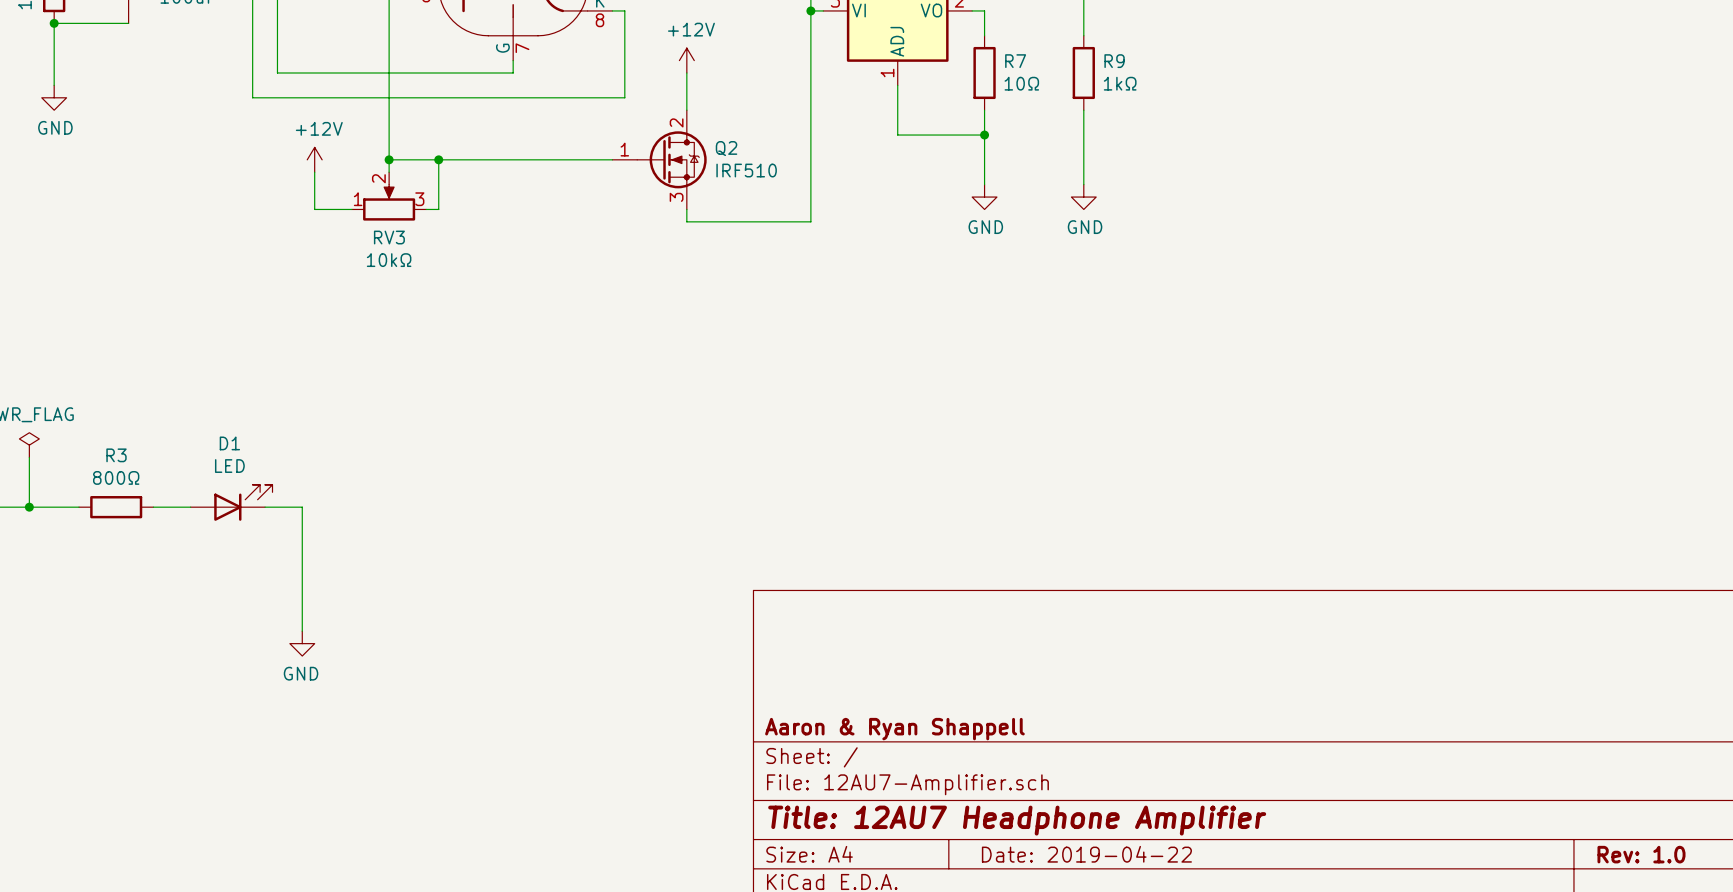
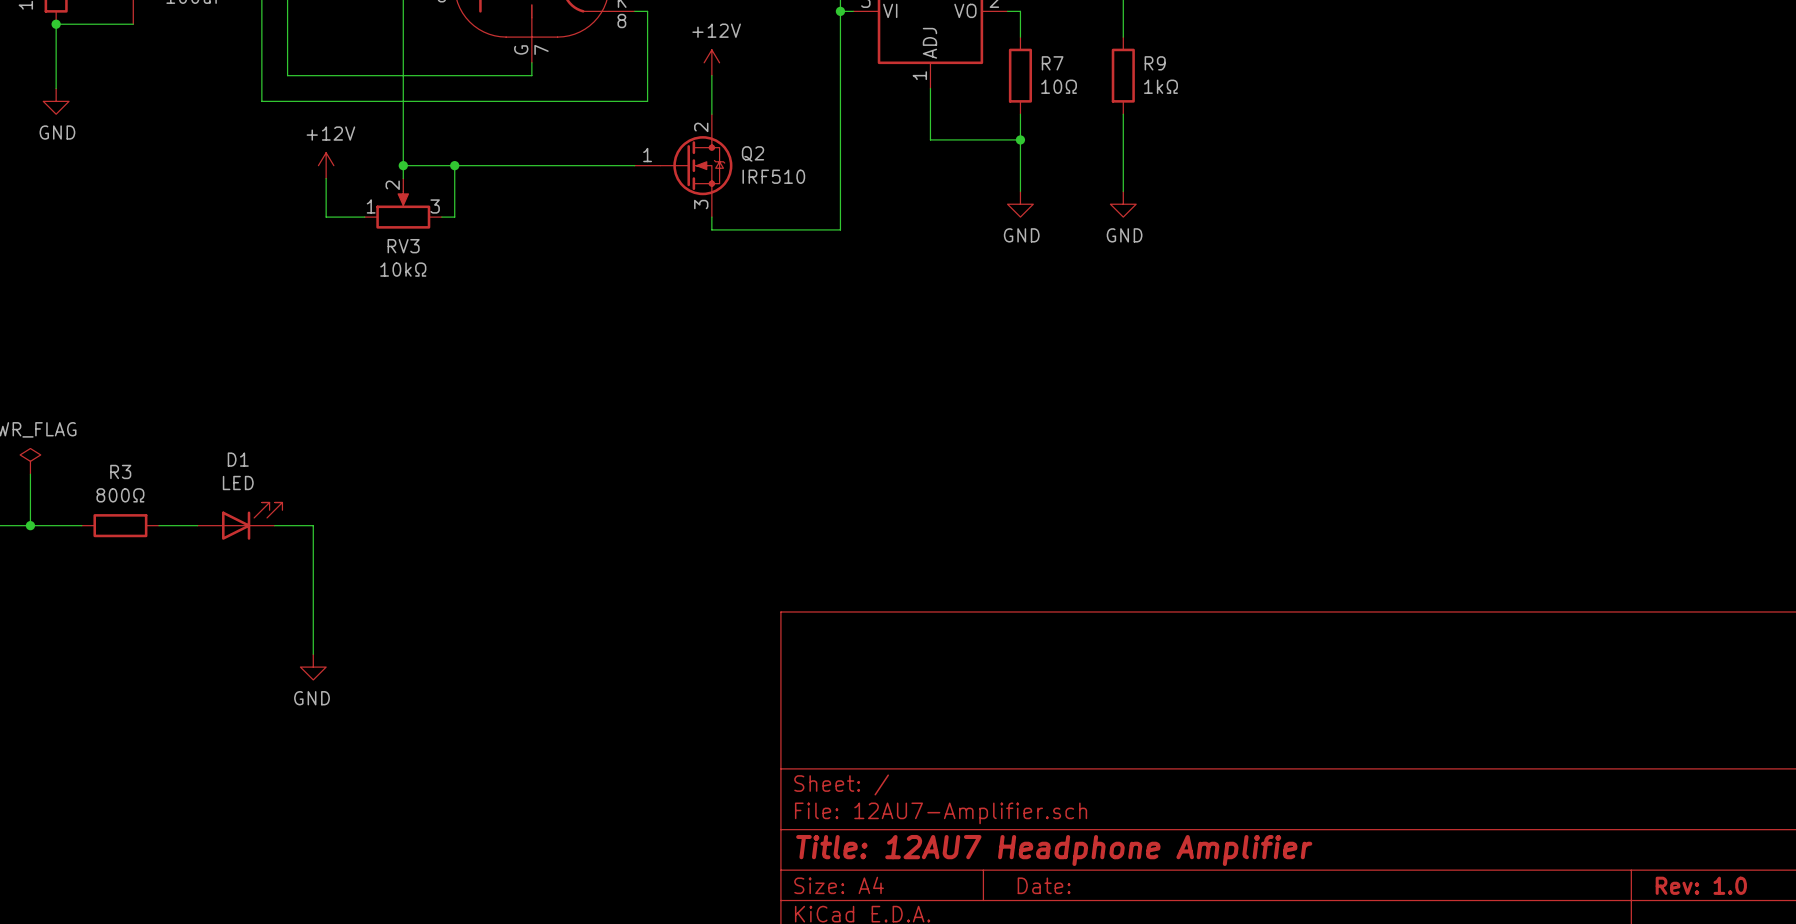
title block: Aaron & Ryan Shappell (894, 729) -> none
title block: Date: 2019-04-22 (1086, 854) -> Date: (1044, 885)

